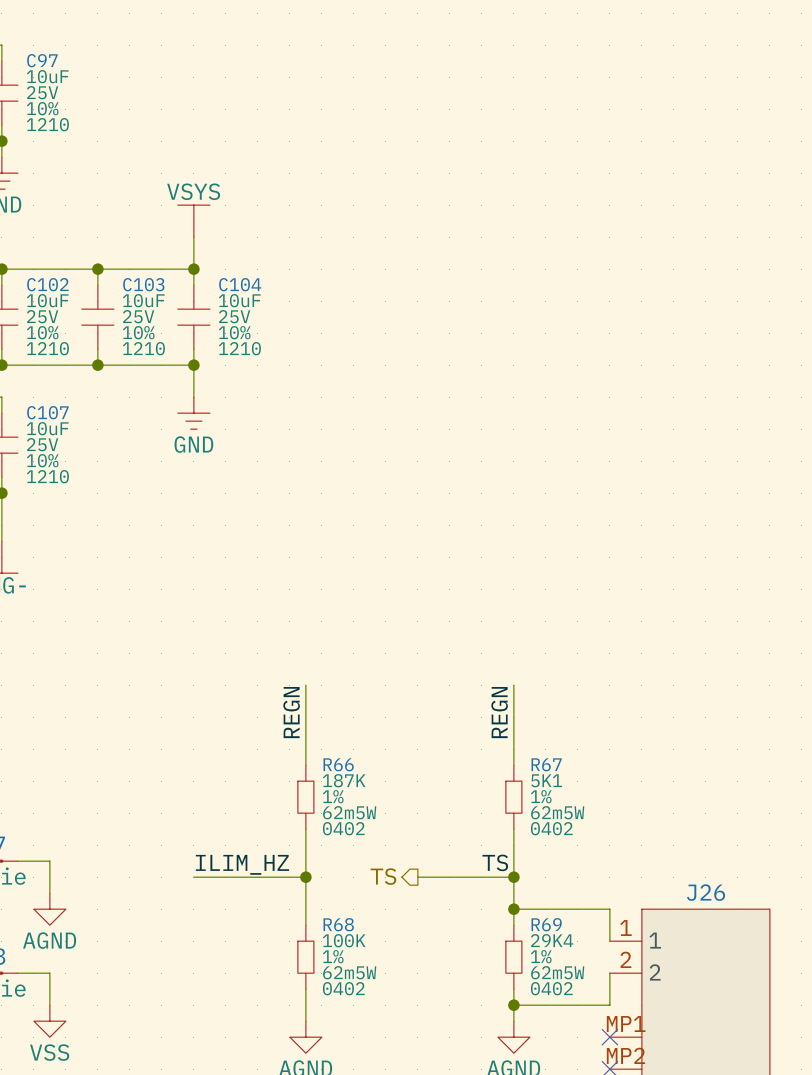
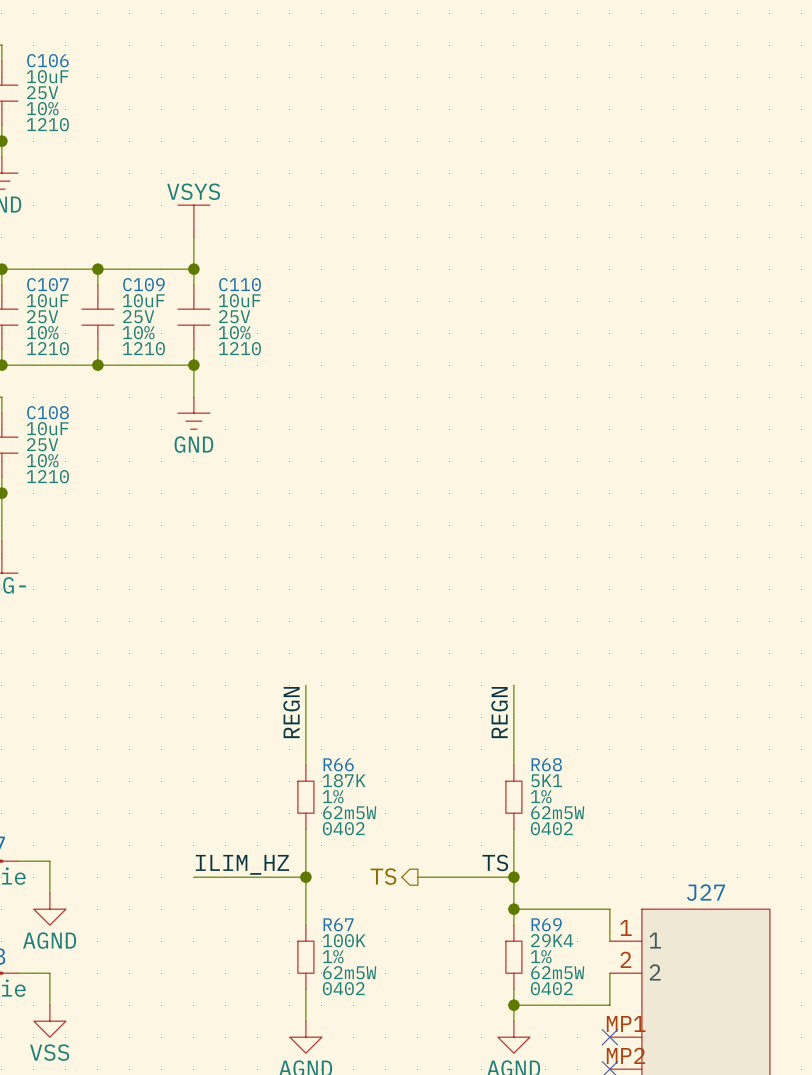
C97 name: C97 (42, 60) -> C106 (47, 60)
C102 name: C102 (47, 284) -> C107 (47, 284)
C103 name: C103 (143, 284) -> C109 (143, 284)
C104 name: C104 (240, 284) -> C110 (240, 284)
C107 name: C107 (47, 412) -> C108 (48, 412)
R67 name: R67 (546, 764) -> R68 (546, 764)
J26 name: J26 (706, 892) -> J27 (705, 892)
R68 name: R68 (338, 924) -> R67 (338, 924)

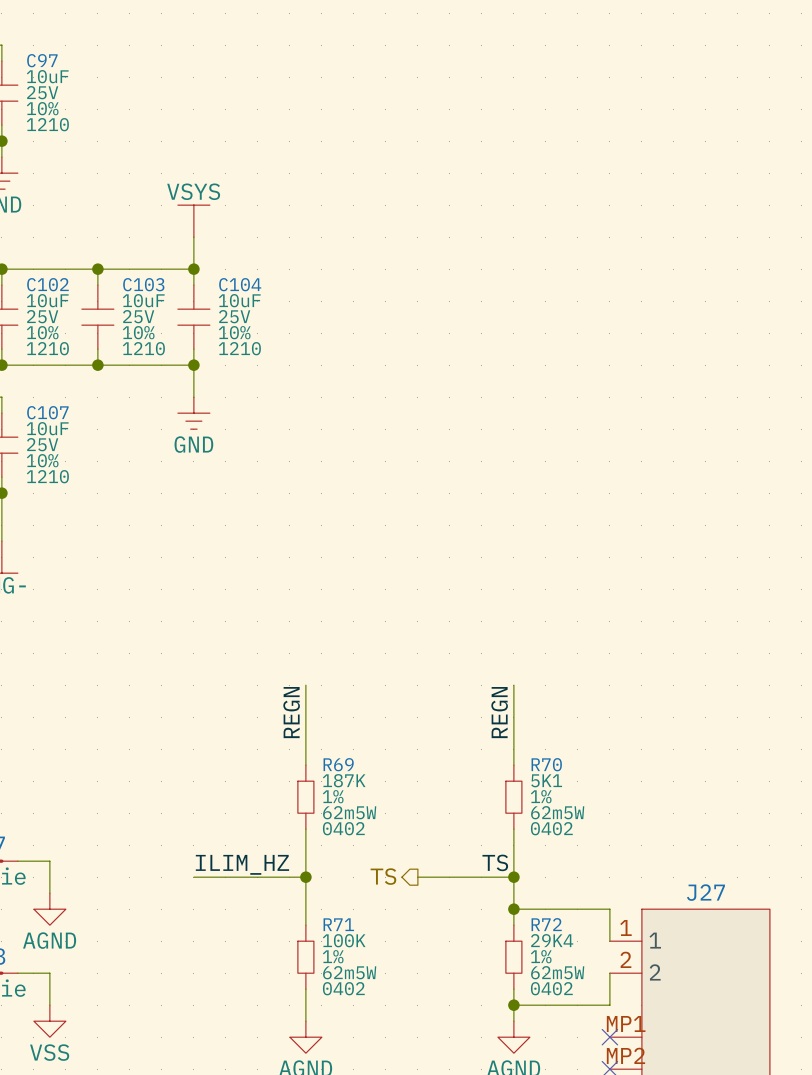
C106 name: C106 (47, 60) -> C97 (42, 60)
C107 name: C107 (47, 284) -> C102 (47, 284)
C109 name: C109 (143, 284) -> C103 (143, 284)
C110 name: C110 (240, 284) -> C104 (240, 284)
C108 name: C108 (48, 412) -> C107 (47, 412)
R66 name: R66 (338, 764) -> R69 (338, 764)
R68 name: R68 (546, 764) -> R70 (546, 764)
R67 name: R67 (338, 924) -> R71 (338, 924)
R69 name: R69 (546, 924) -> R72 (546, 924)

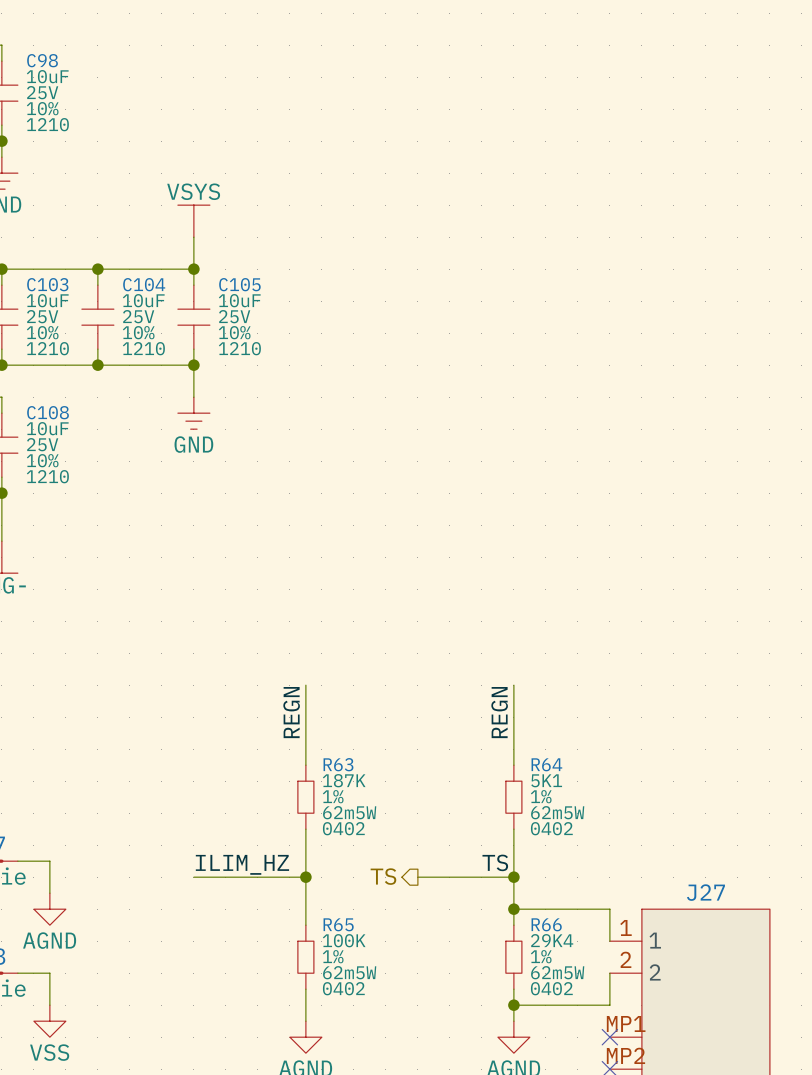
C97 name: C97 (42, 60) -> C98 (42, 60)
C102 name: C102 (47, 284) -> C103 (47, 284)
C103 name: C103 (143, 284) -> C104 (144, 284)
C104 name: C104 (240, 284) -> C105 (239, 284)
C107 name: C107 (47, 412) -> C108 (48, 412)
R69 name: R69 (338, 764) -> R63 (338, 764)
R70 name: R70 (546, 764) -> R64 (546, 764)
R71 name: R71 (338, 924) -> R65 (338, 924)
R72 name: R72 (546, 924) -> R66 (546, 924)

